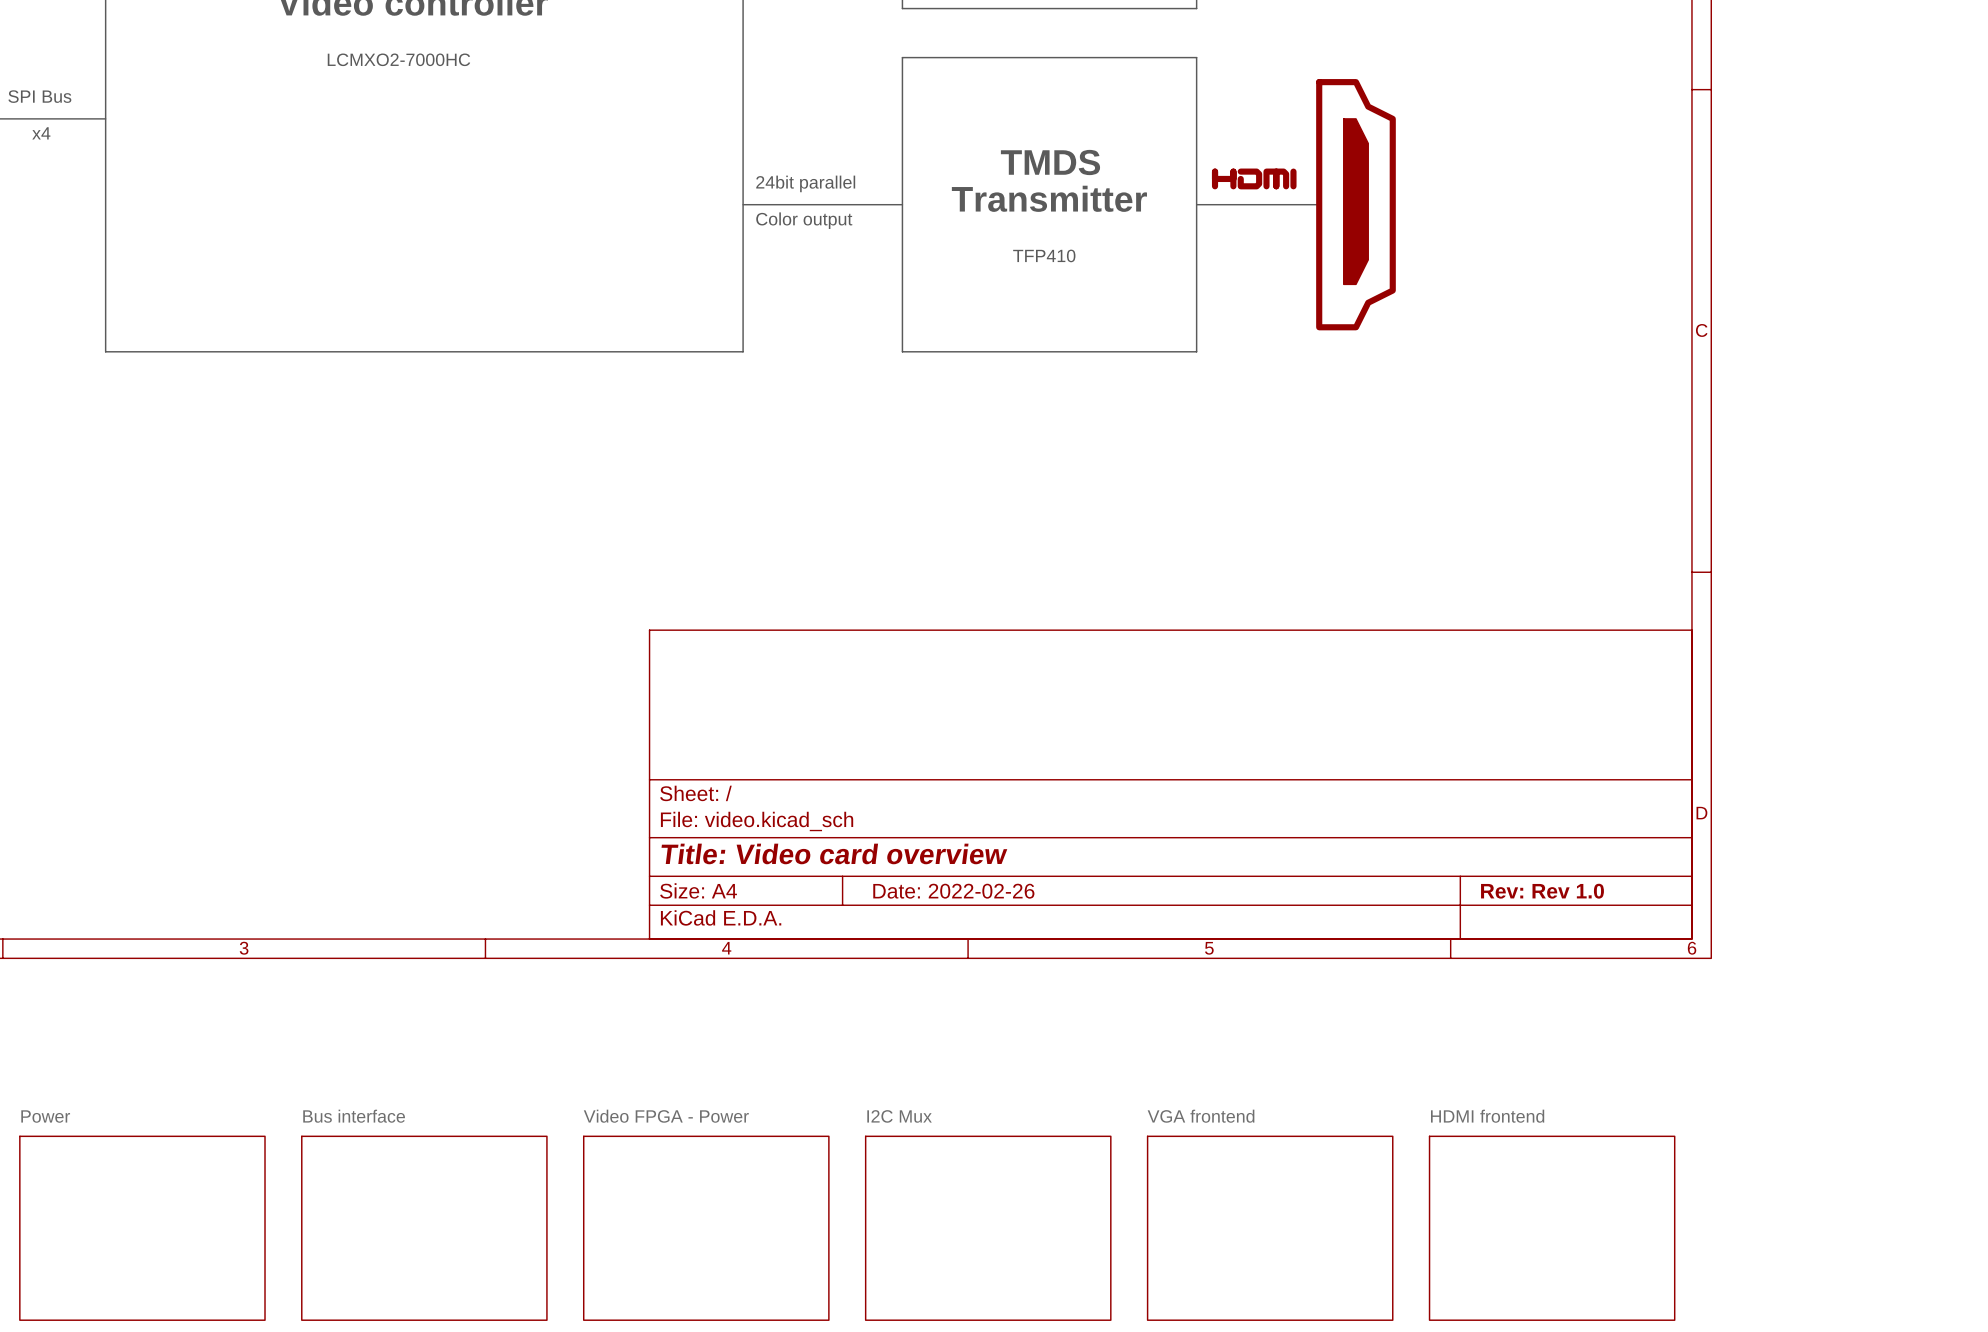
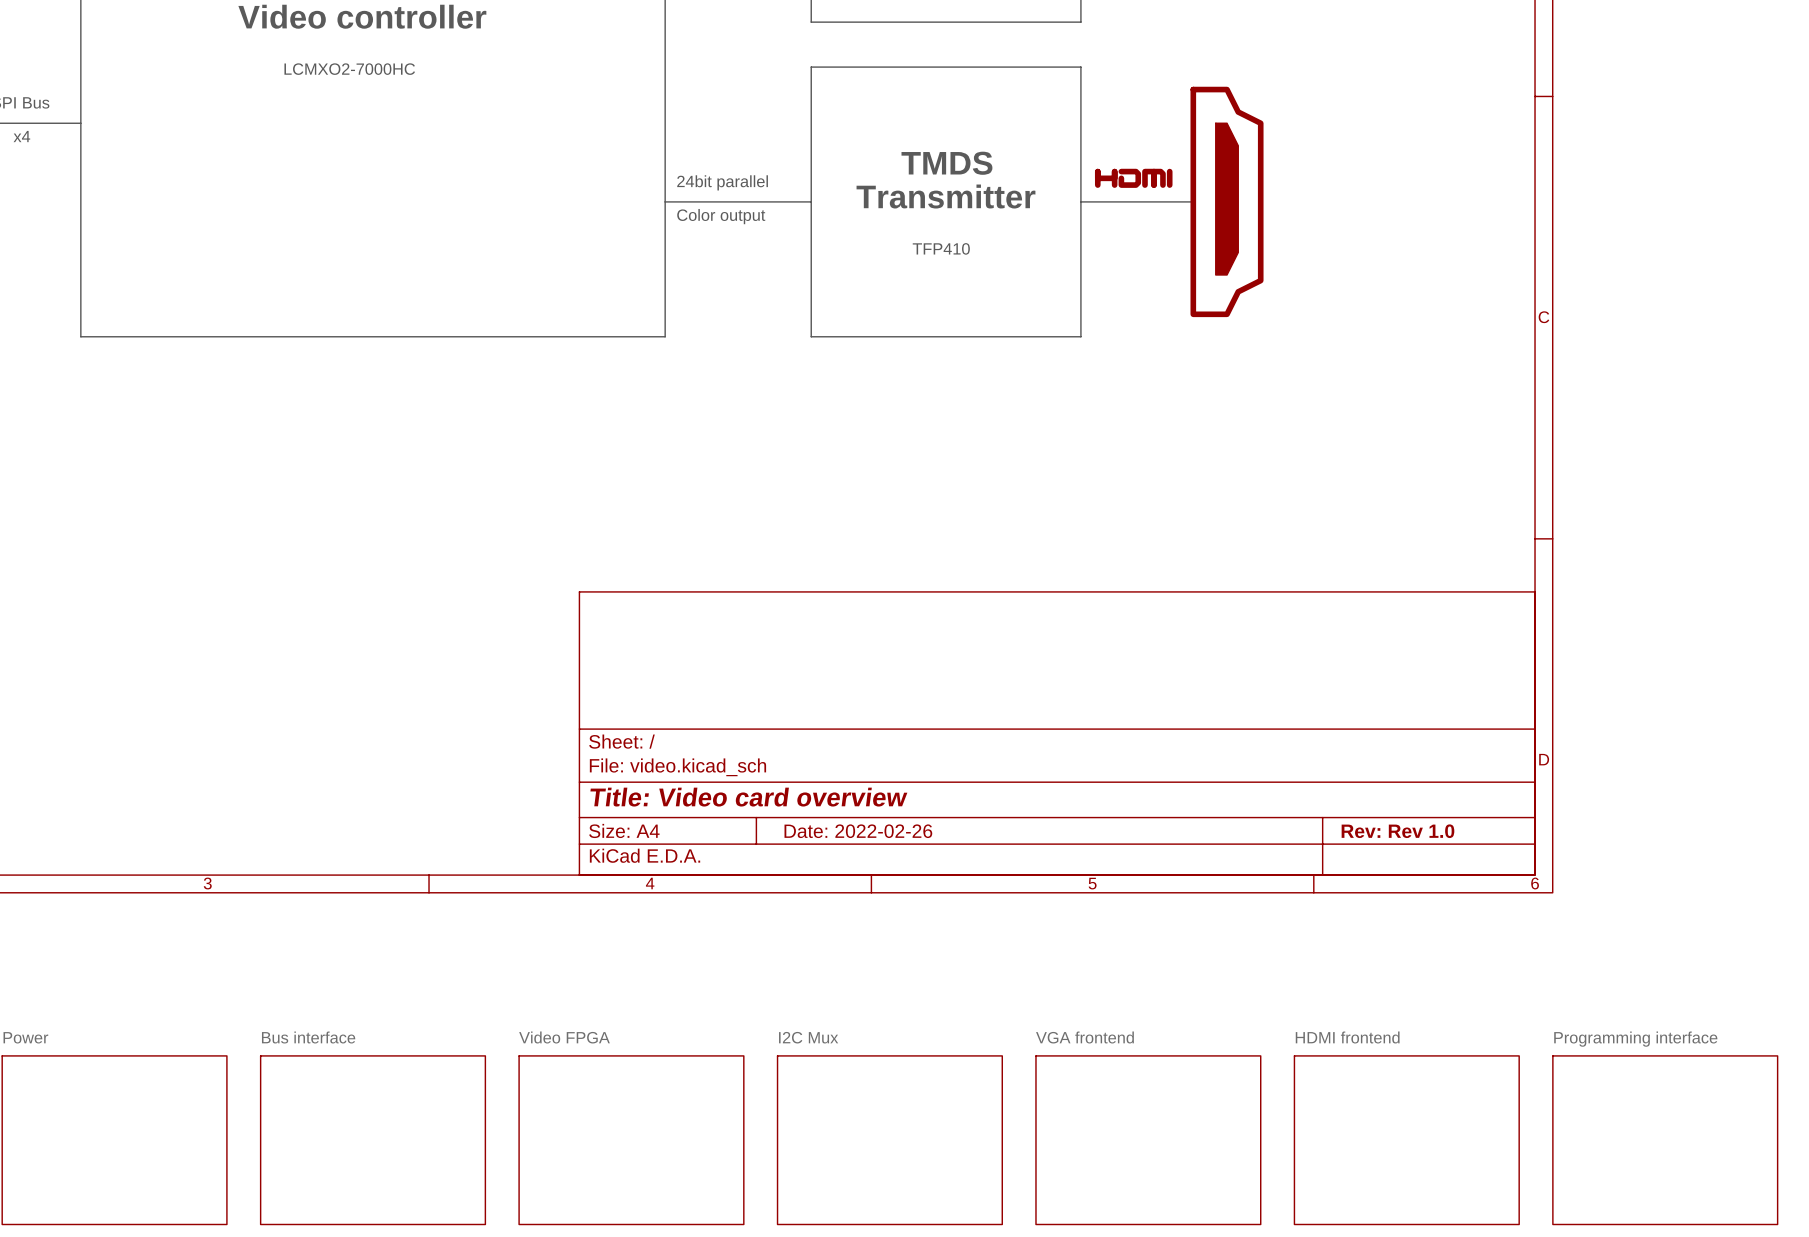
sheet Video FPGA - Power name: Video FPGA - Power (666, 1116) -> Video FPGA (564, 1037)
sheet Programming interface: none -> (1665, 1140)

